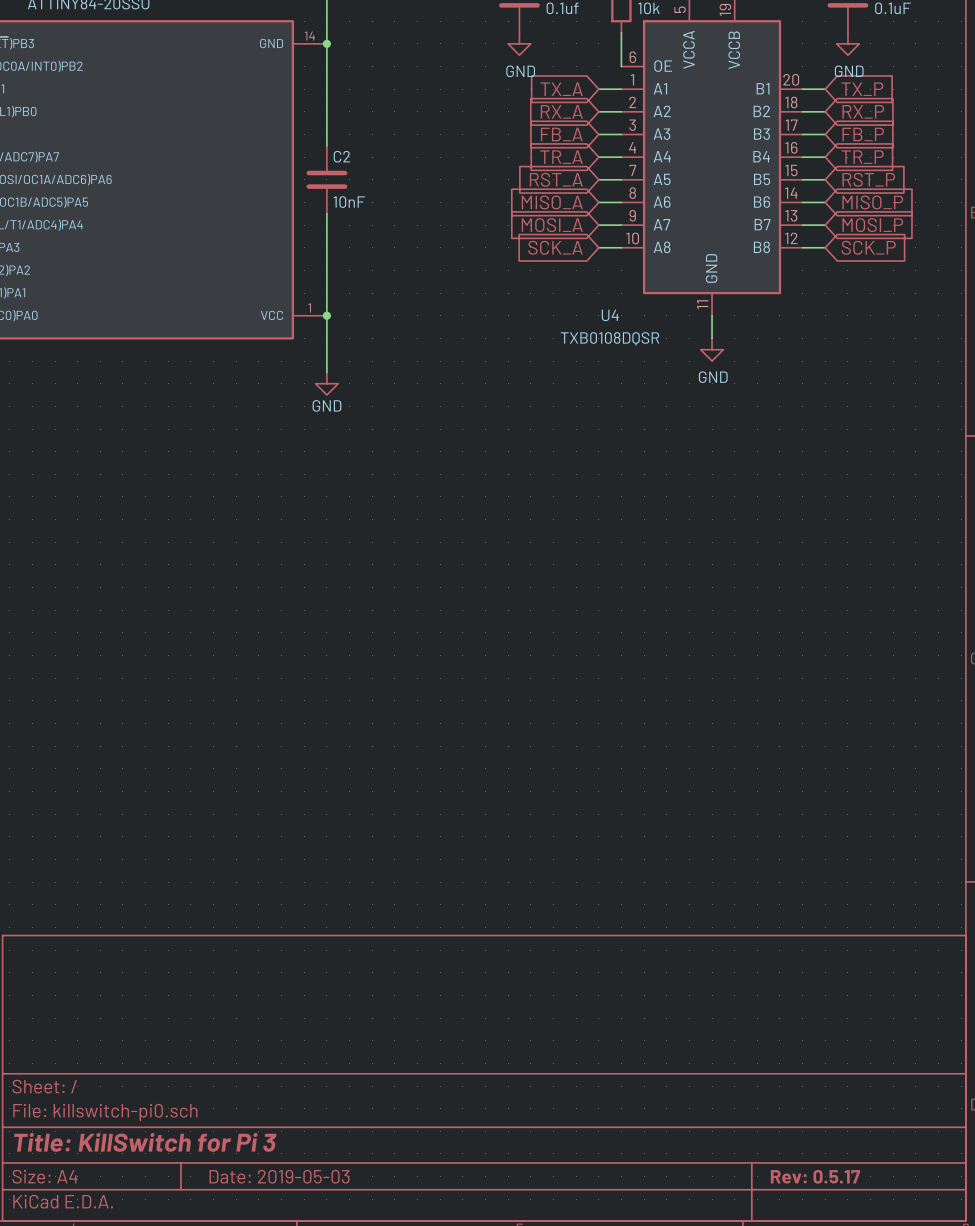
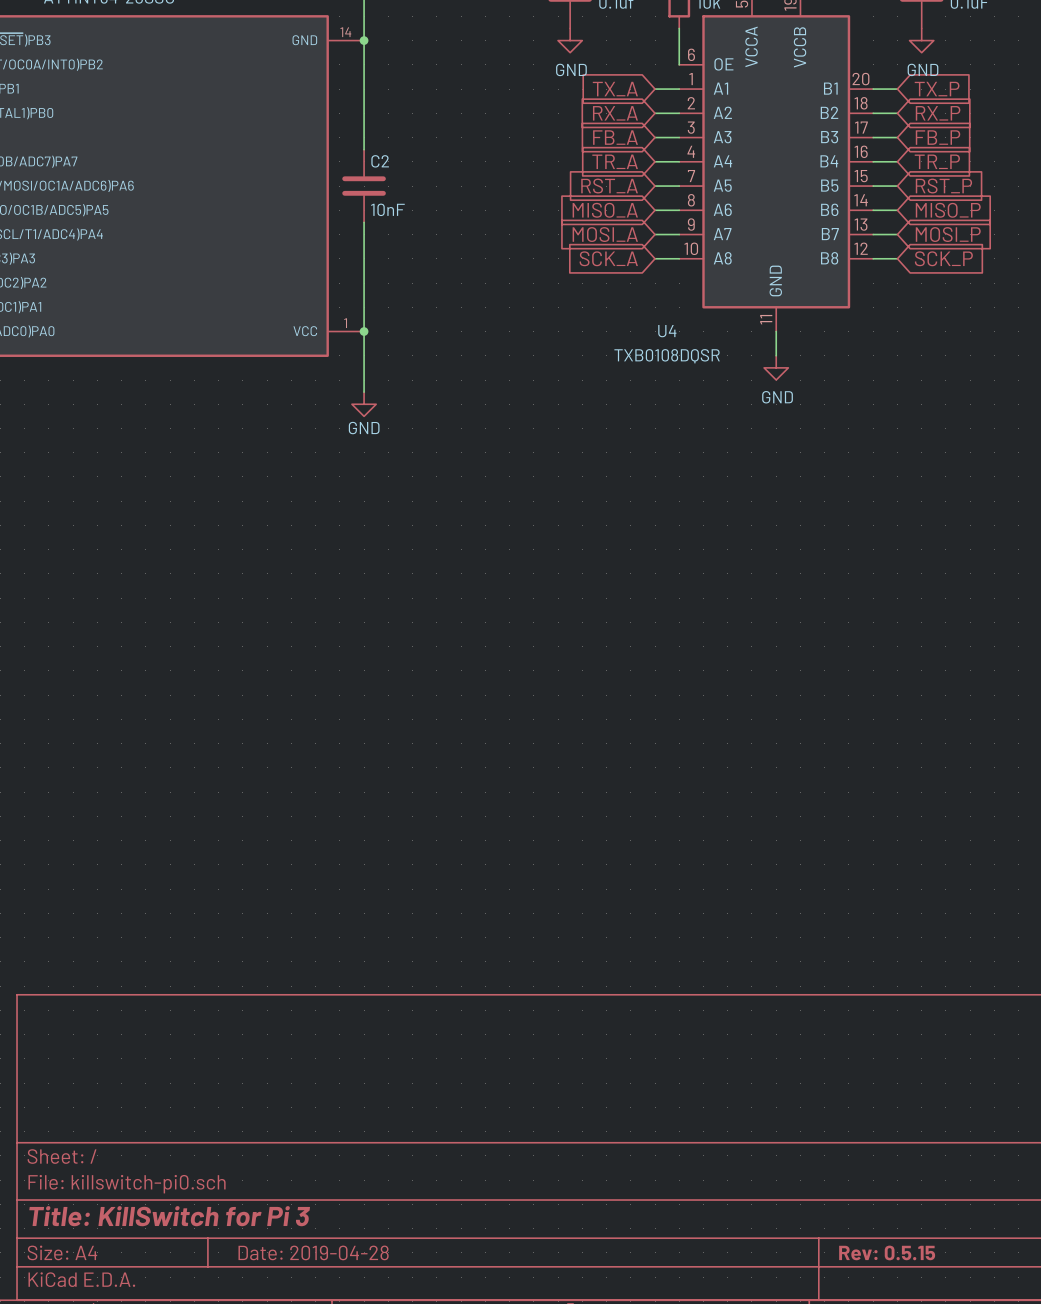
title block: Date: 2019-05-03 (279, 1176) -> Date: 2019-04-28 (313, 1252)
title block: Rev: 0.5.17 (815, 1176) -> Rev: 0.5.15 (887, 1252)

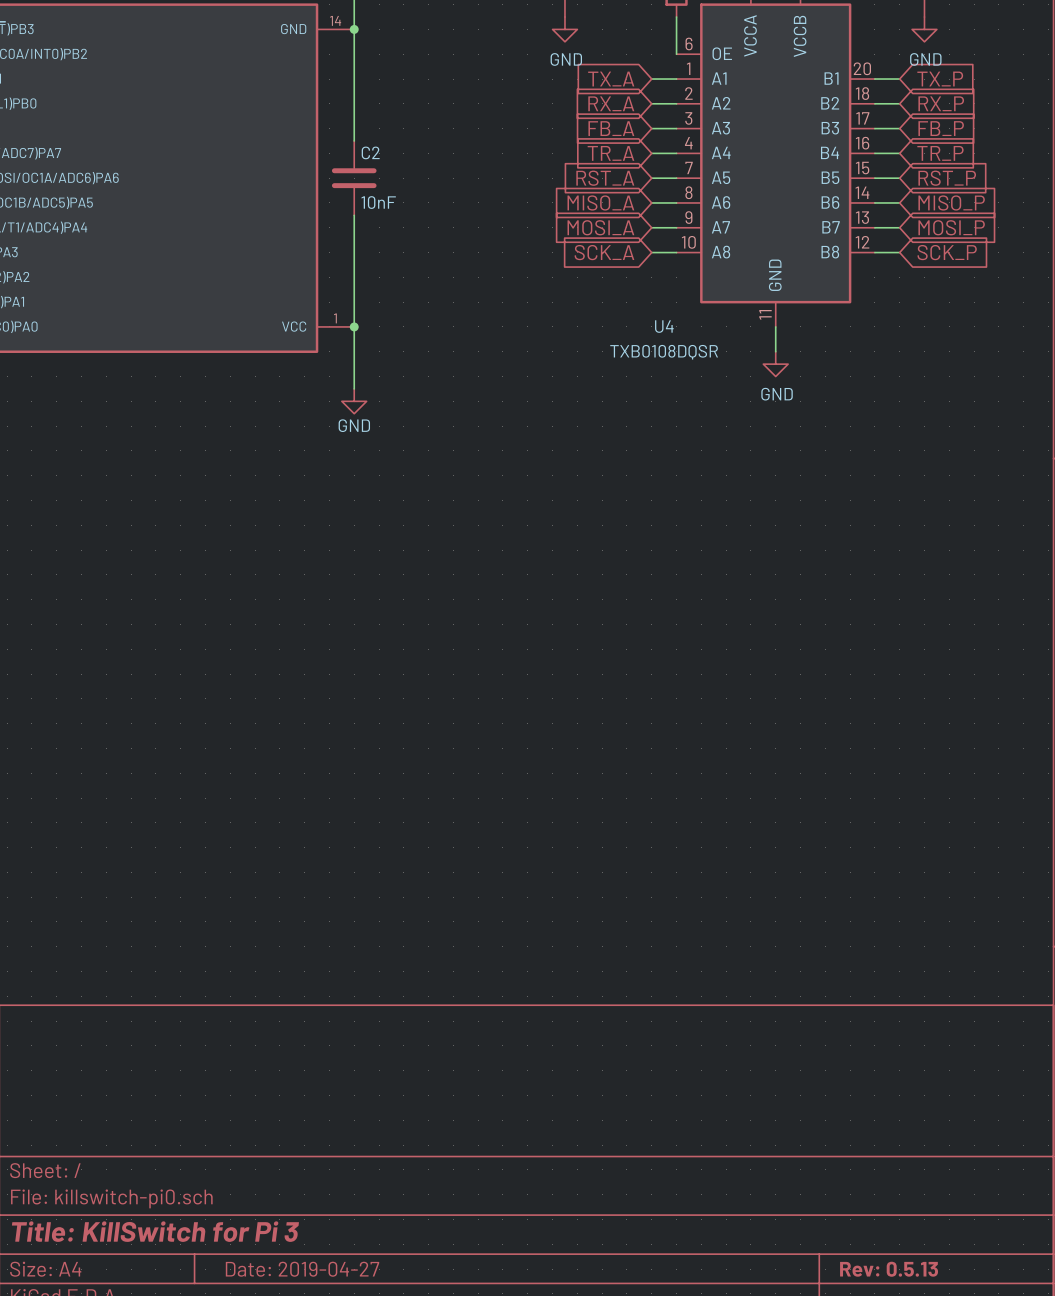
title block: Date: 2019-04-28 (313, 1252) -> Date: 2019-04-27 (302, 1269)
title block: Rev: 0.5.15 (887, 1252) -> Rev: 0.5.13 (889, 1269)

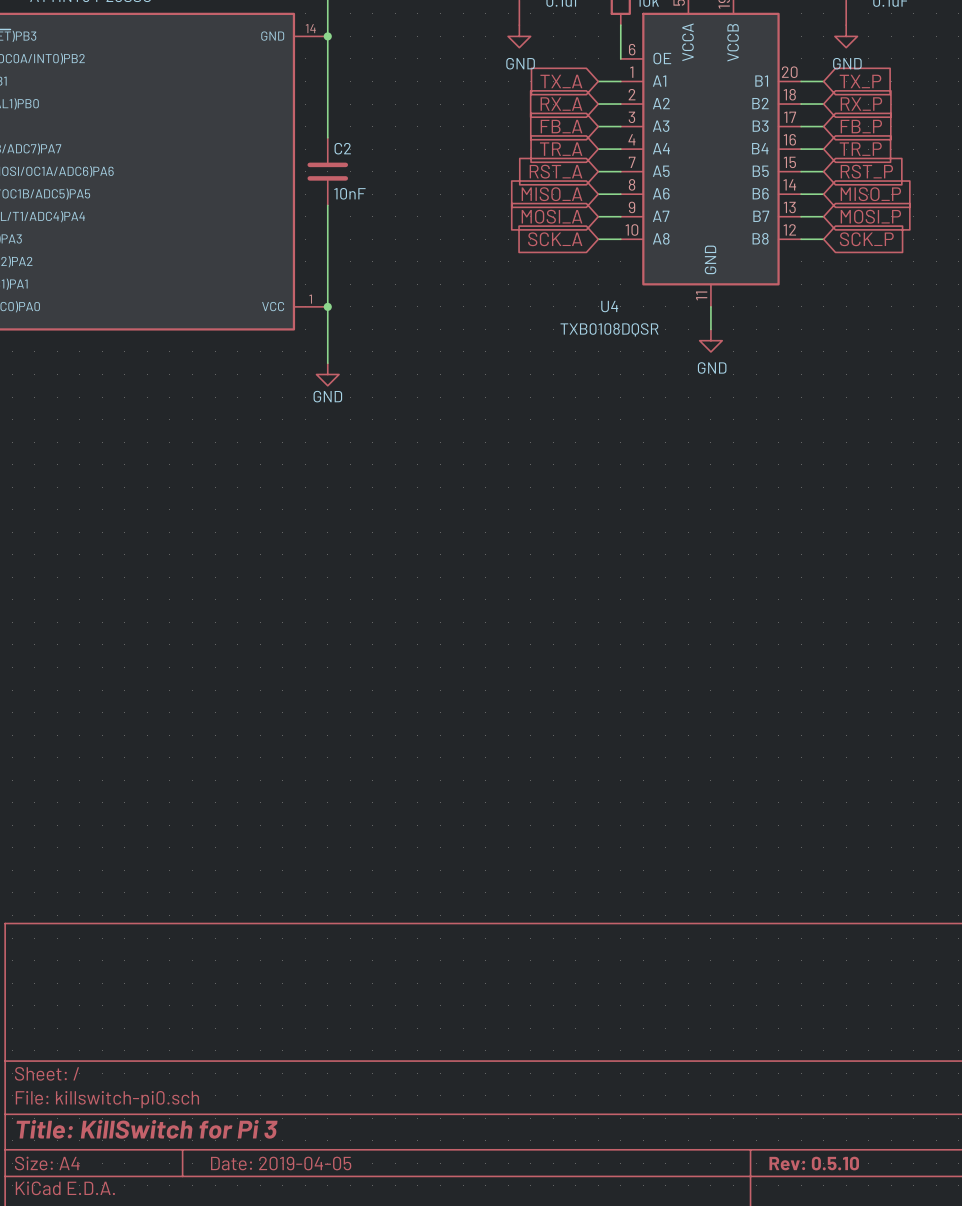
title block: Date: 2019-04-27 (302, 1269) -> Date: 2019-04-05 (281, 1163)
title block: Rev: 0.5.13 (889, 1269) -> Rev: 0.5.10 (814, 1163)

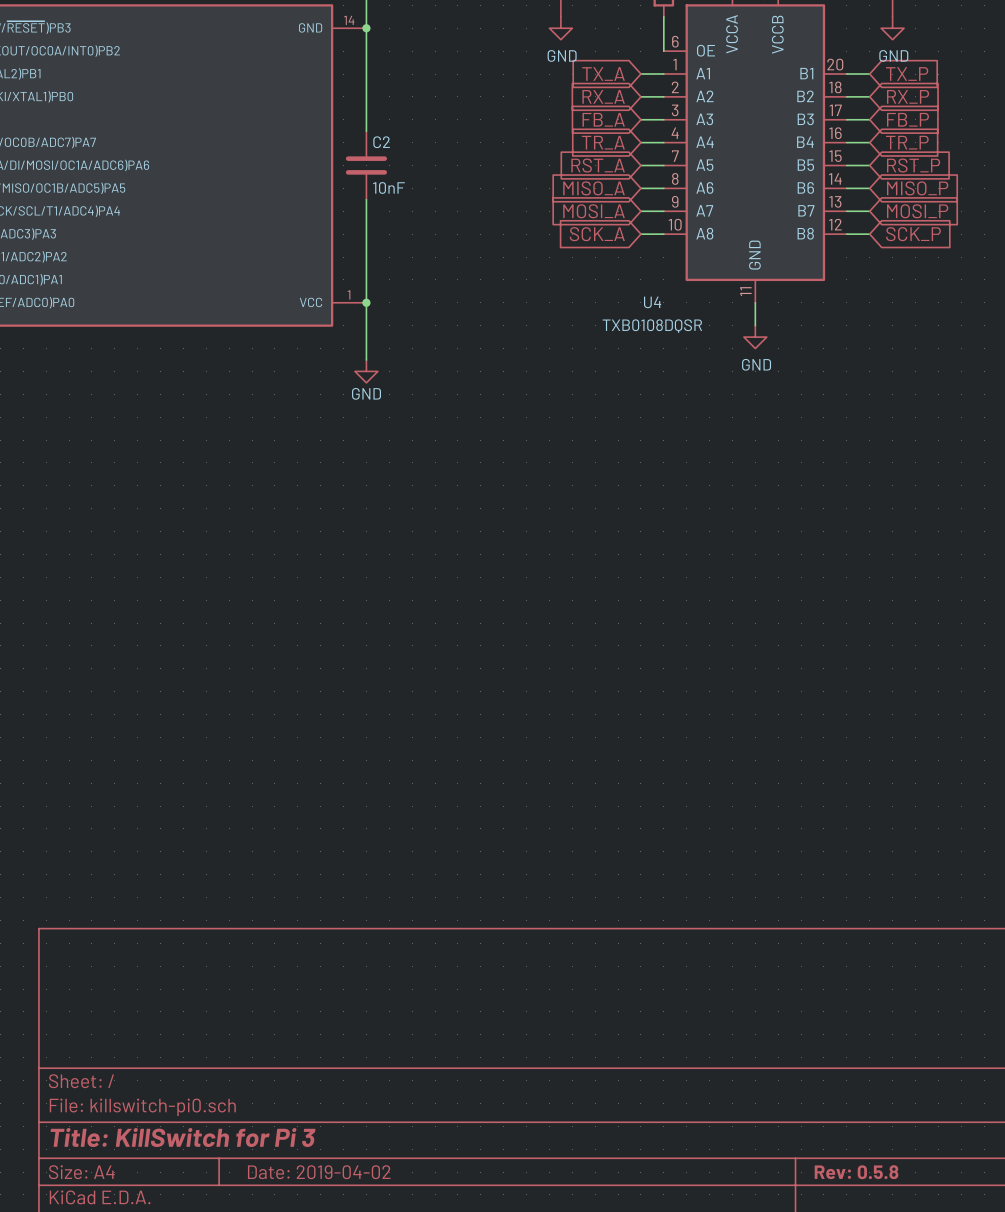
title block: Date: 2019-04-05 (281, 1163) -> Date: 2019-04-02 (319, 1172)
title block: Rev: 0.5.10 (814, 1163) -> Rev: 0.5.8 (856, 1172)

